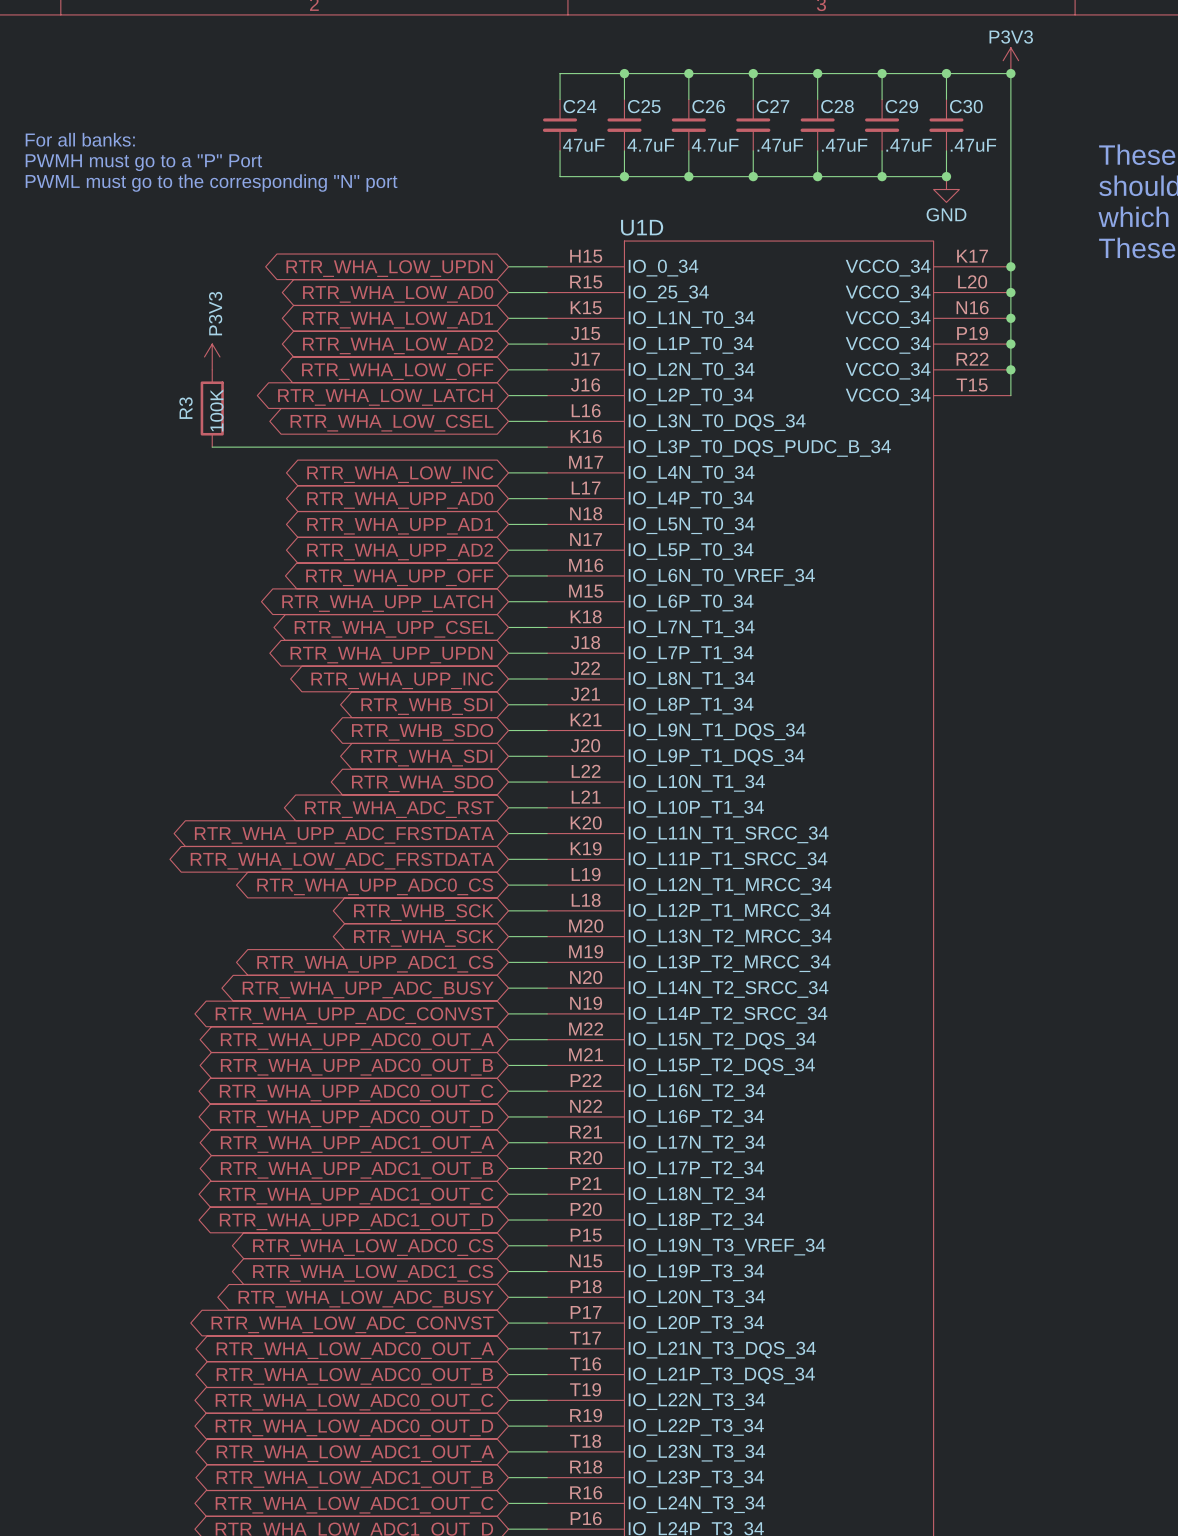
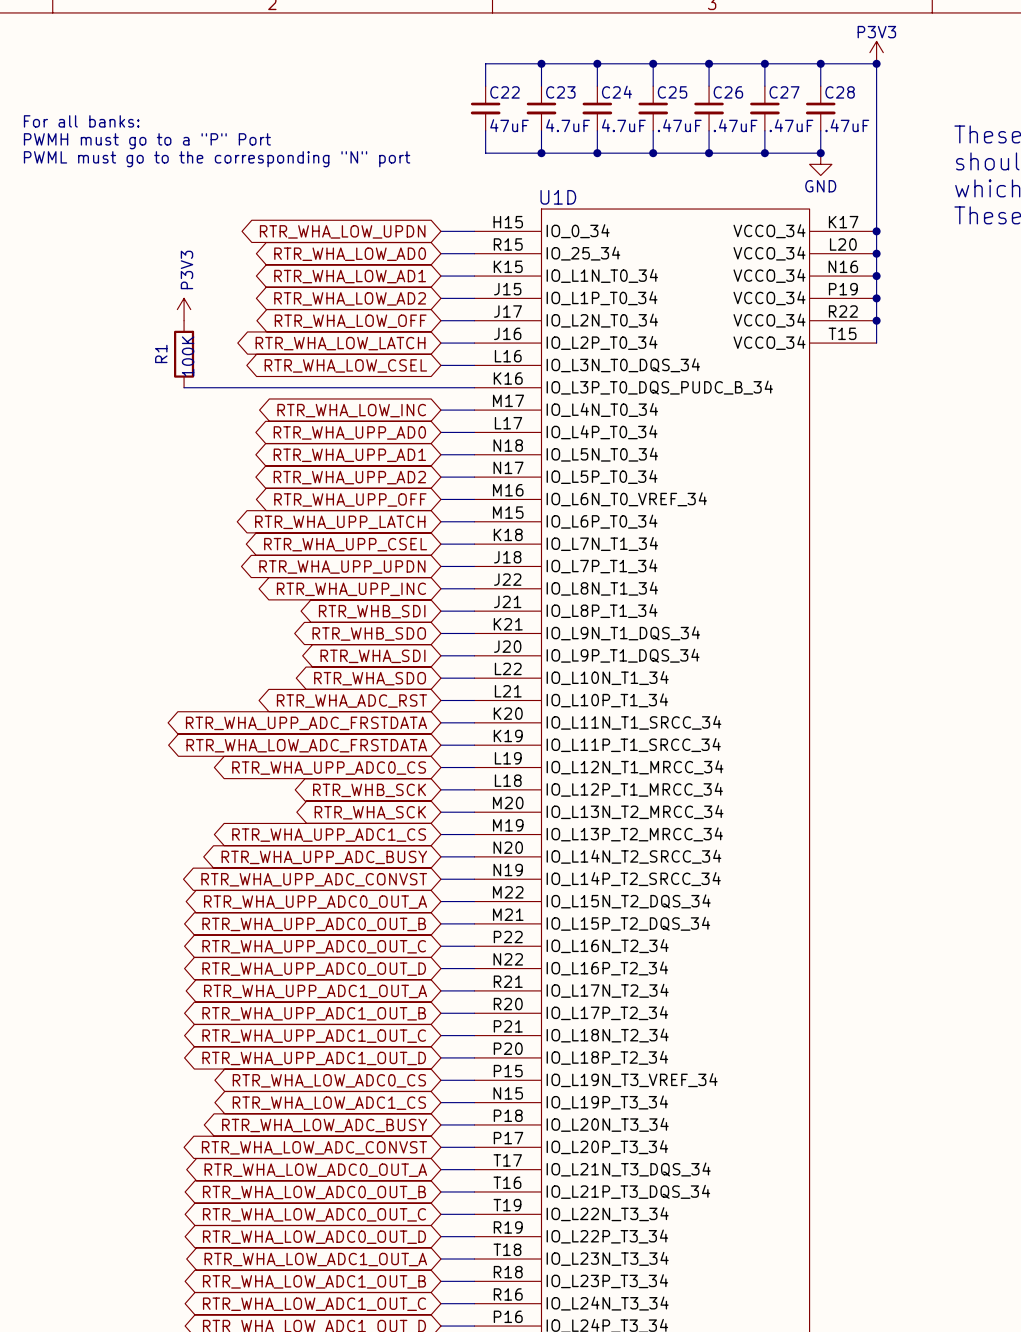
C24 name: C24 (579, 106) -> C22 (504, 92)
C25 name: C25 (644, 106) -> C23 (560, 92)
C26 name: C26 (708, 106) -> C24 (616, 92)
C27 name: C27 (773, 106) -> C25 (672, 92)
C28 name: C28 (837, 106) -> C26 (728, 92)
C29 name: C29 (901, 106) -> C27 (784, 92)
C30 name: C30 (966, 106) -> C28 (840, 92)
R3 name: R3 (185, 408) -> R1 (161, 353)

